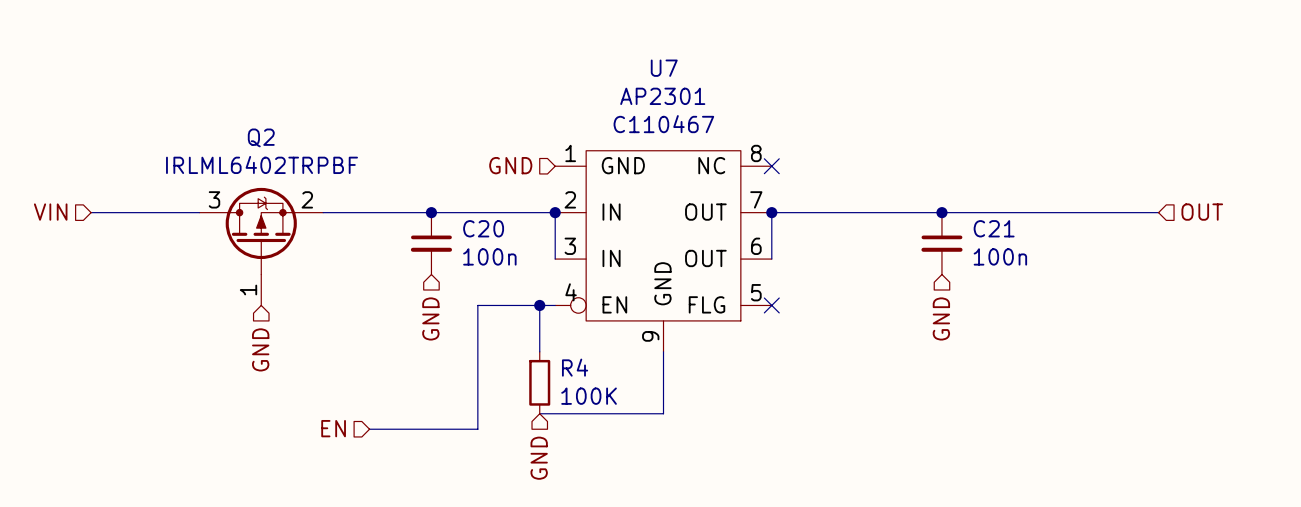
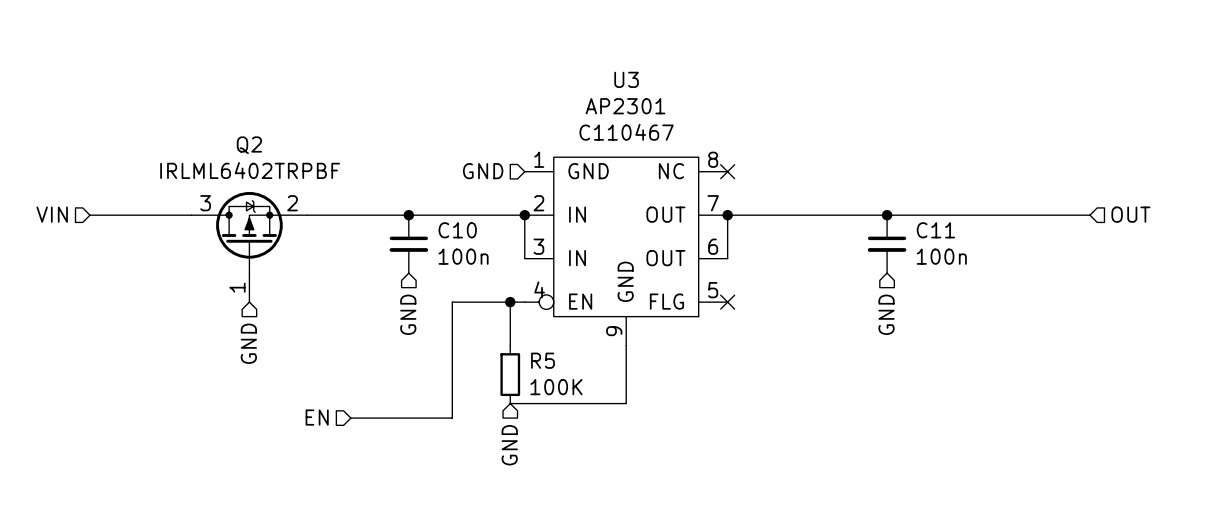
U7 name: U7 (664, 68) -> U3 (626, 79)
C20 name: C20 (483, 228) -> C10 (457, 230)
C21 name: C21 (994, 228) -> C11 (935, 230)
R4 name: R4 (575, 367) -> R5 (543, 360)

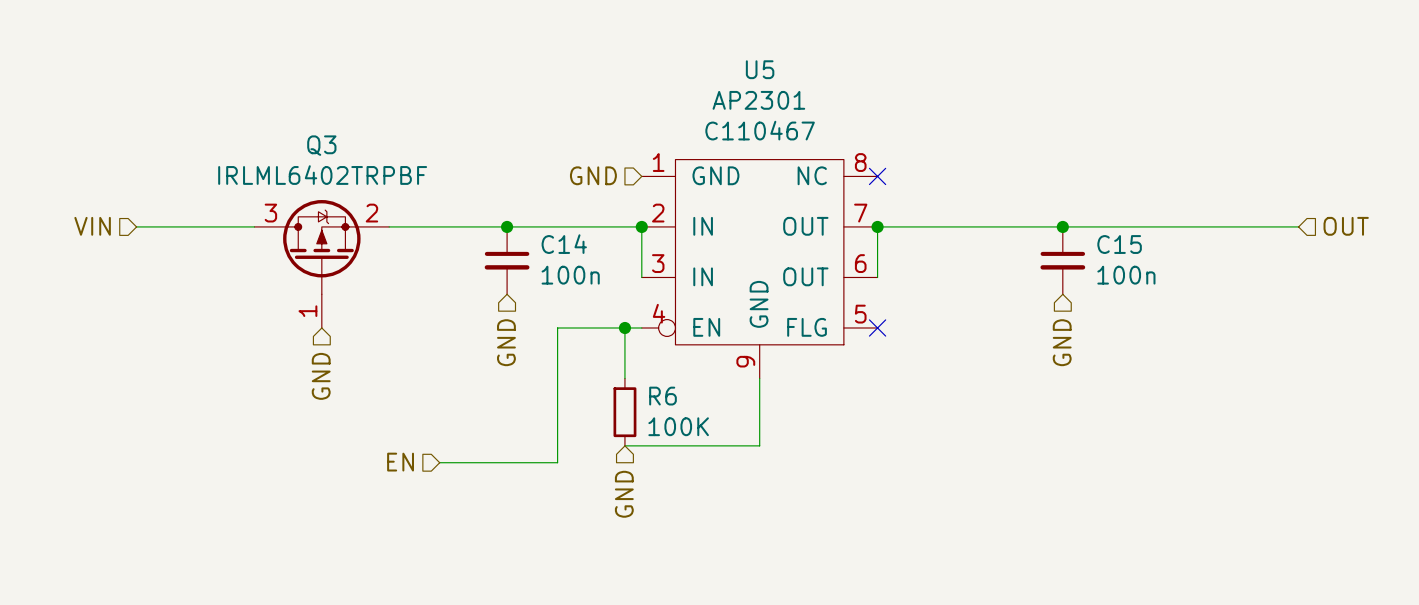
U3 name: U3 (626, 79) -> U5 (760, 69)
Q2 name: Q2 (249, 145) -> Q3 (321, 145)
C10 name: C10 (457, 230) -> C14 (564, 244)
C11 name: C11 (935, 230) -> C15 (1119, 244)
R5 name: R5 (543, 360) -> R6 (663, 396)

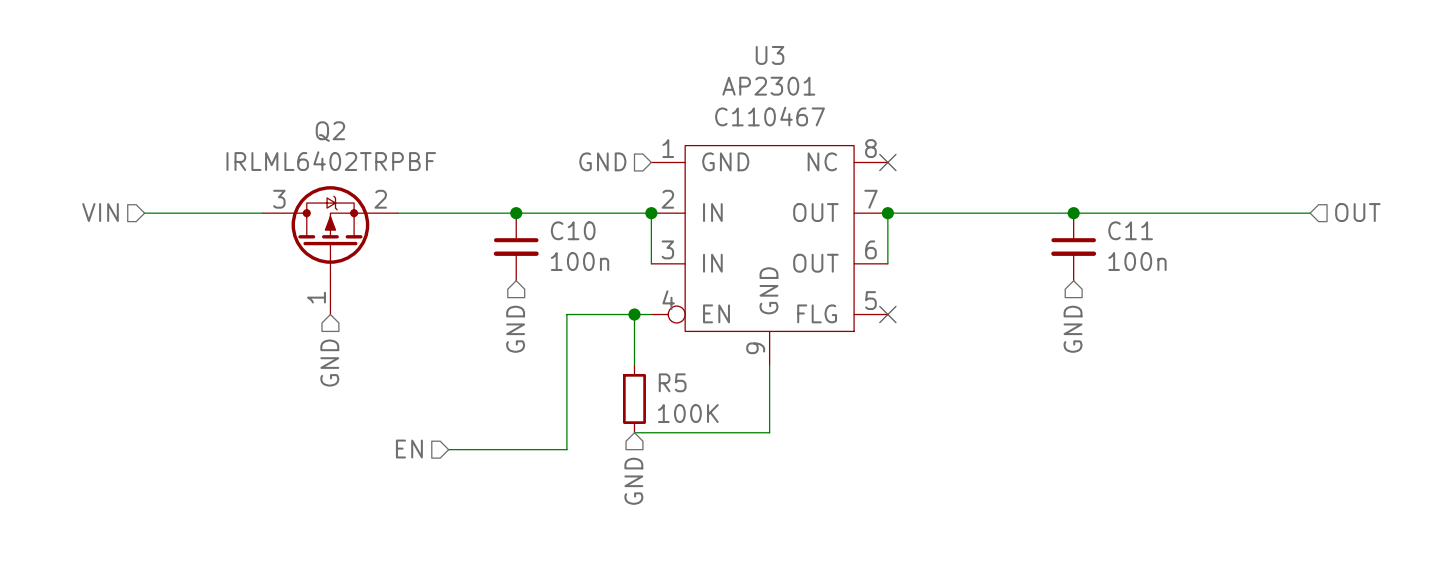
U5 name: U5 (760, 69) -> U3 (770, 55)
Q3 name: Q3 (321, 145) -> Q2 (330, 131)
C14 name: C14 (564, 244) -> C10 (573, 230)
C15 name: C15 (1119, 244) -> C11 (1130, 230)
R6 name: R6 (663, 396) -> R5 (672, 382)

